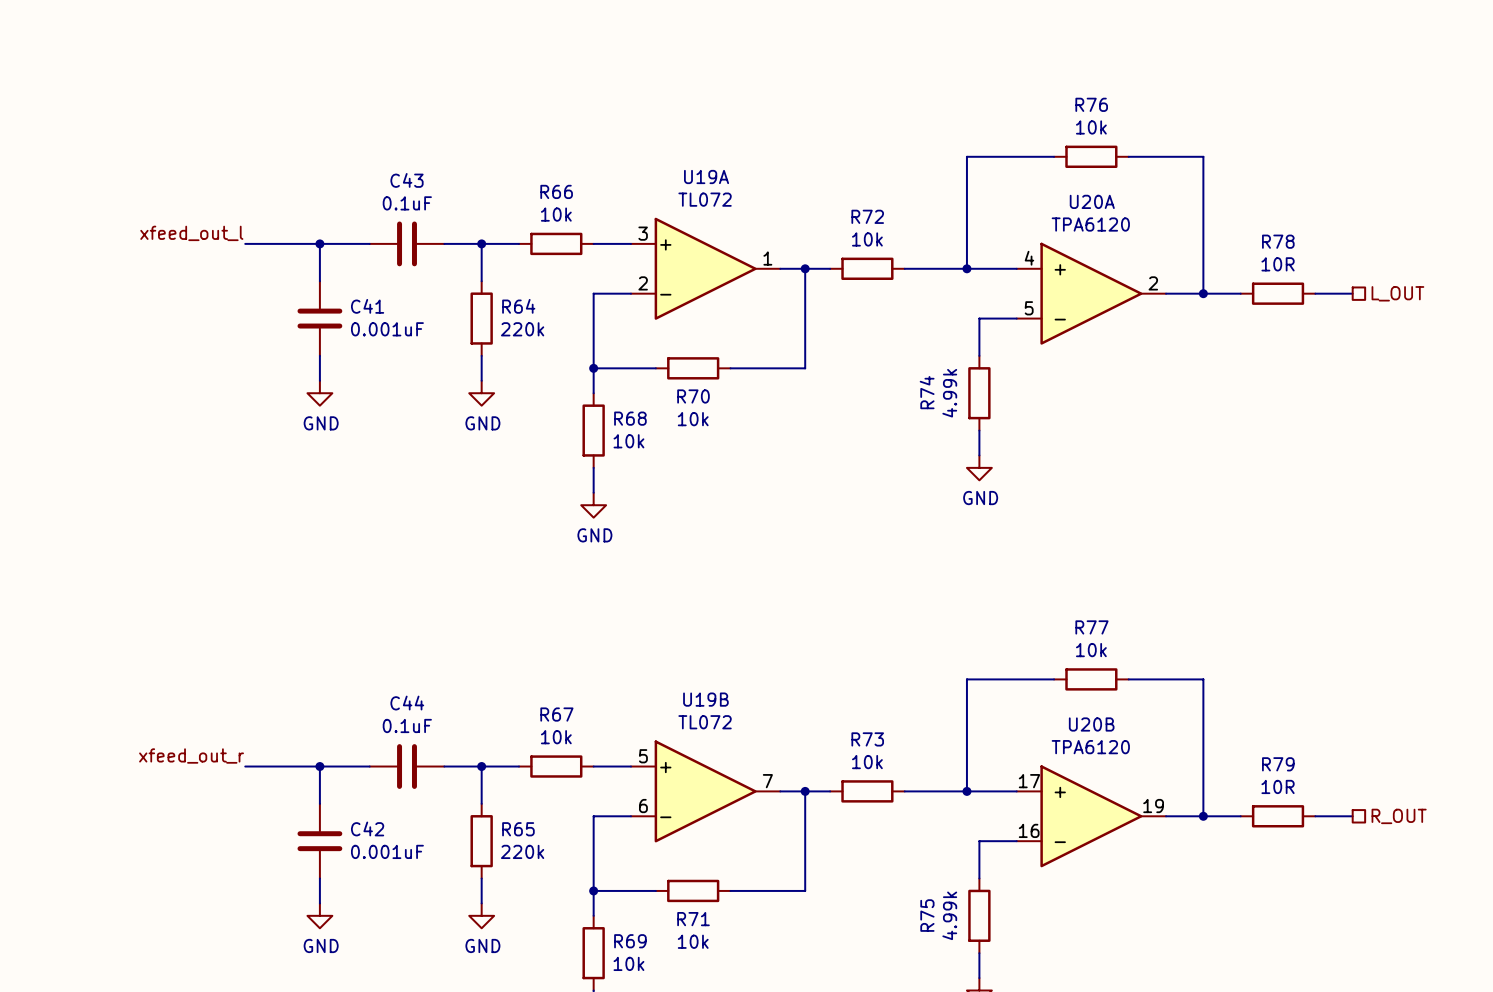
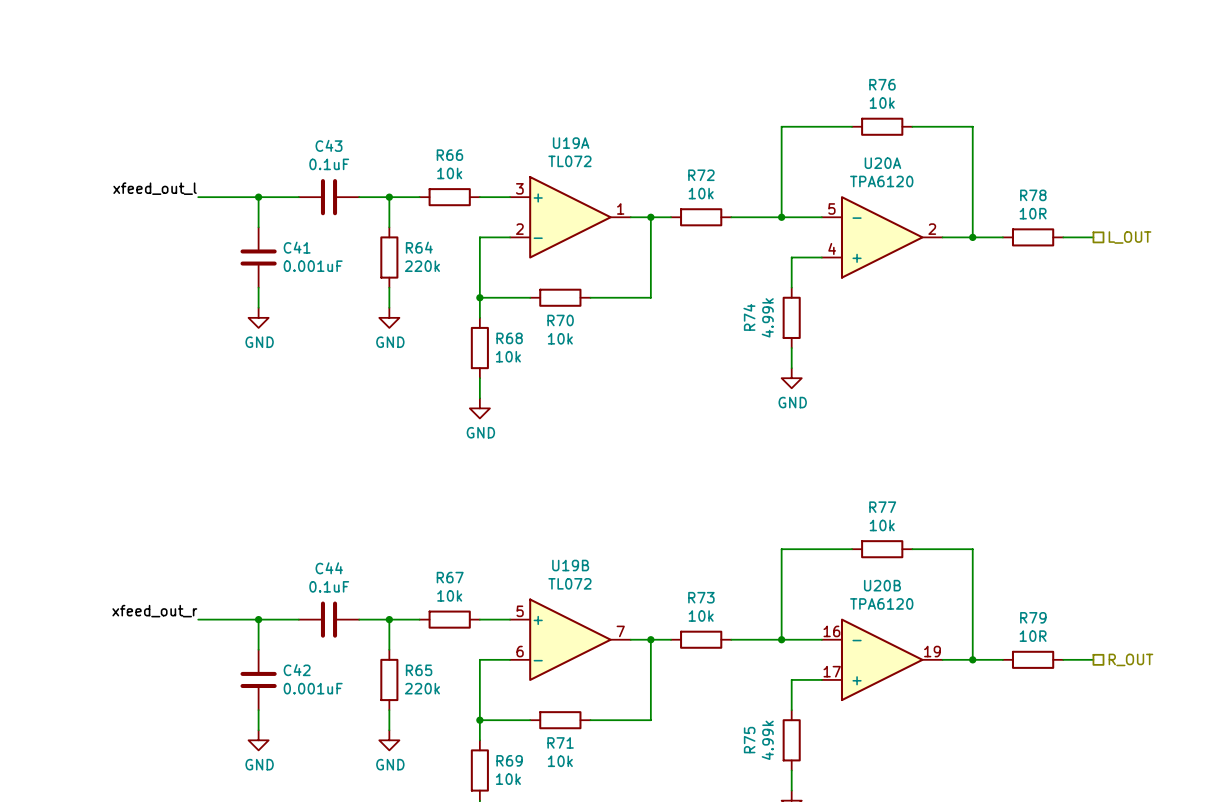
U20A flip: as is (1091, 293) -> up-down (882, 237)
U20B flip: as is (1091, 816) -> up-down (882, 659)

